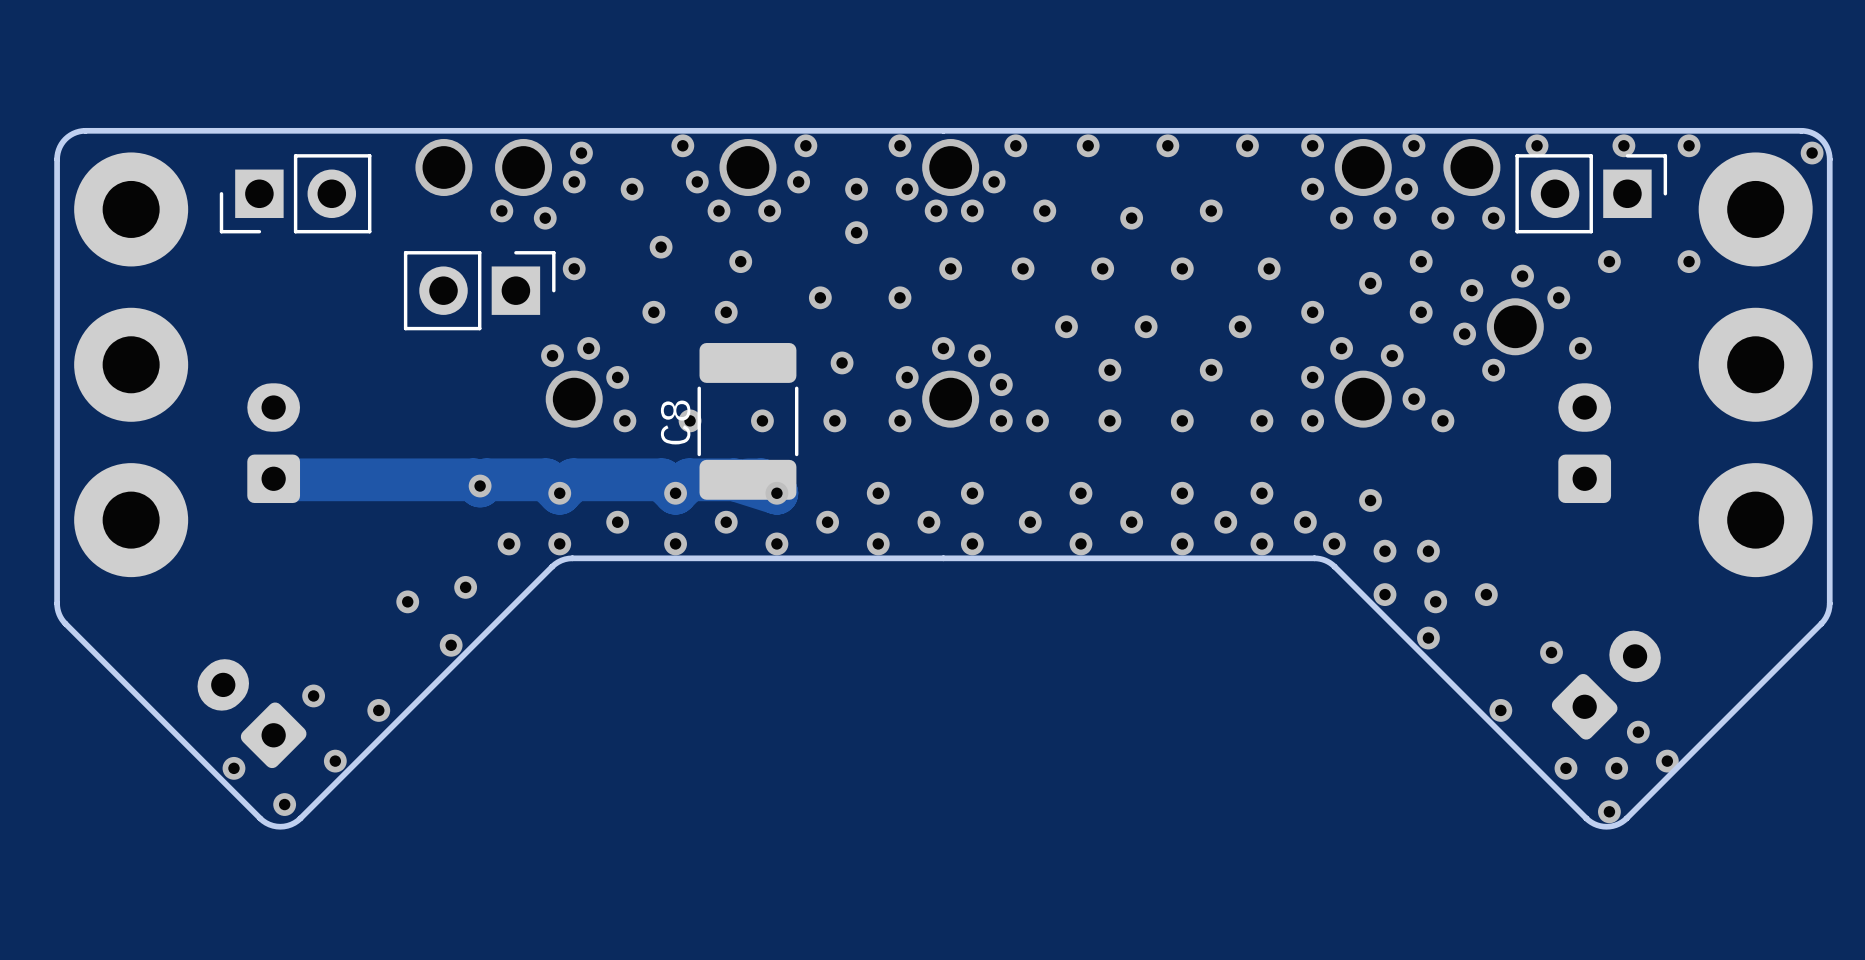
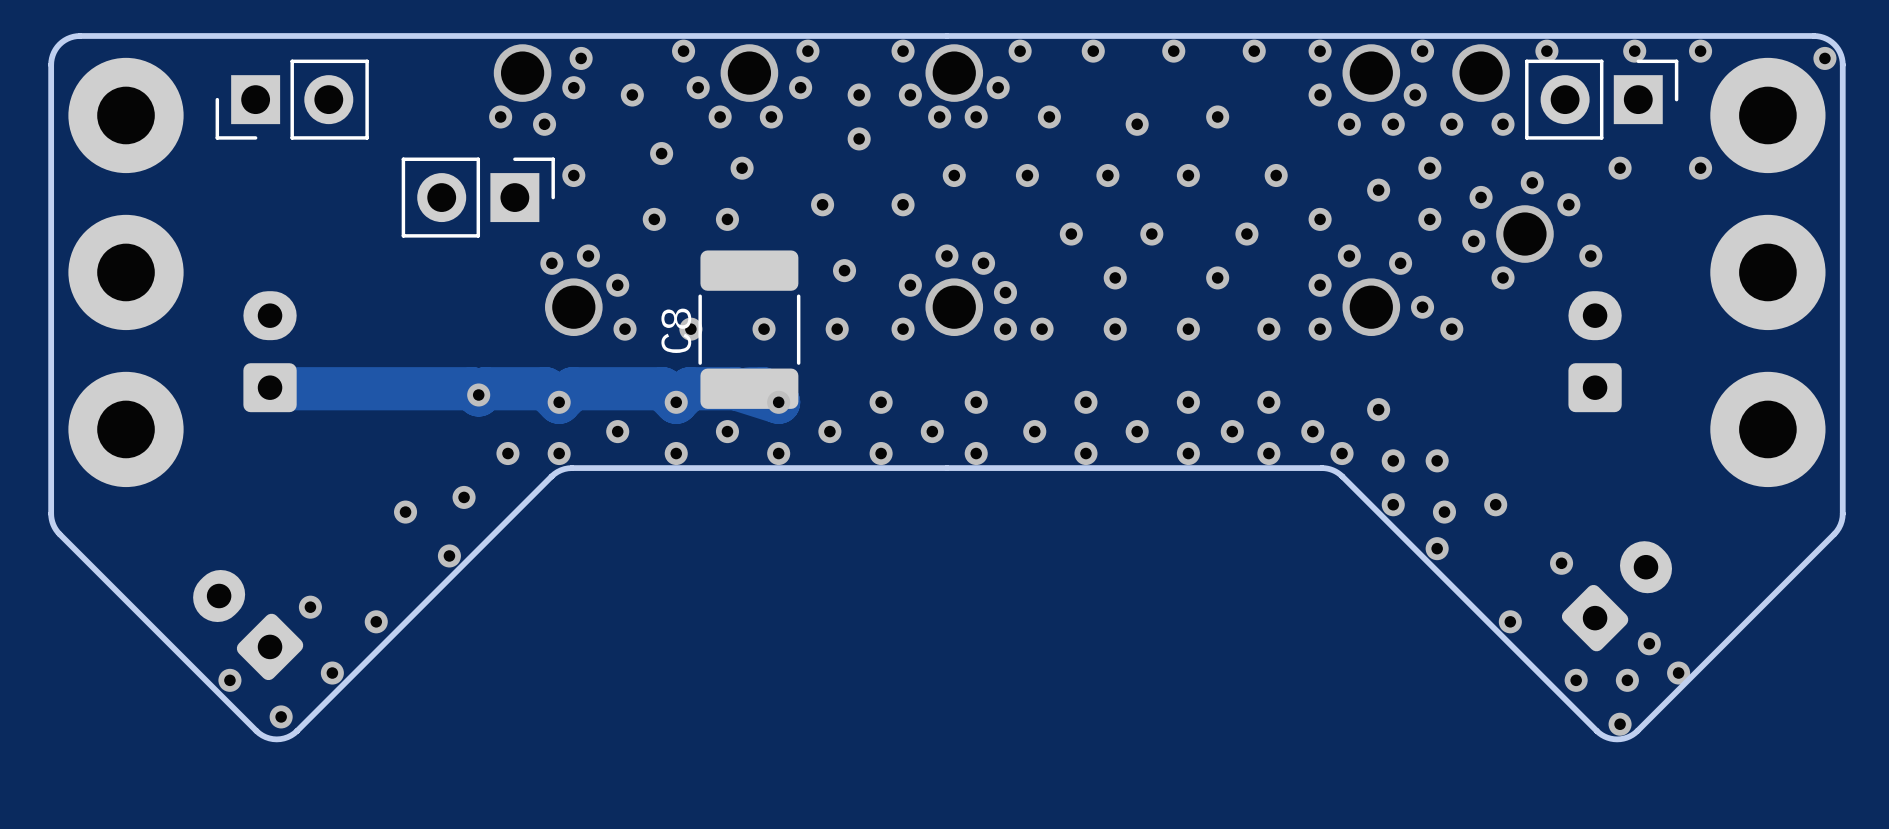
via: (443, 167) -> none

